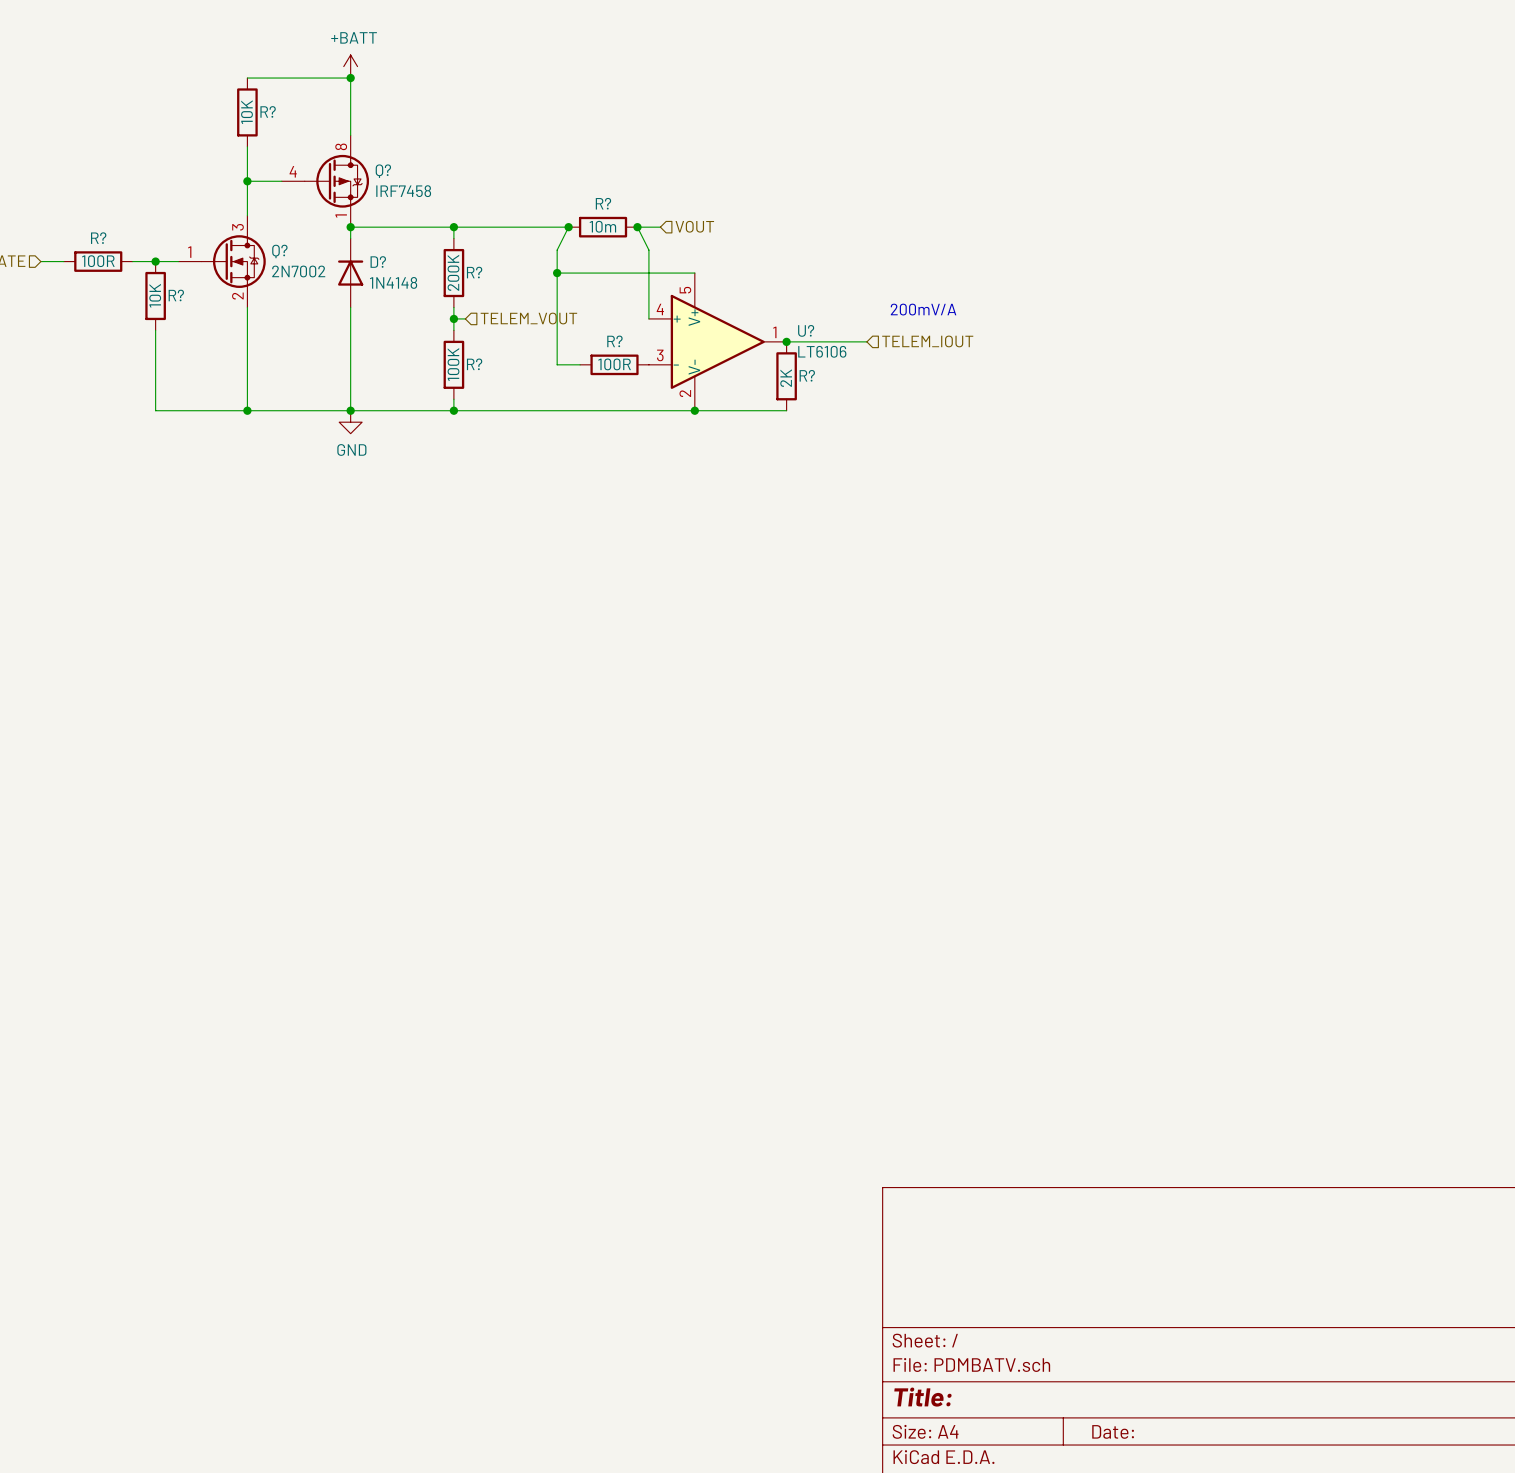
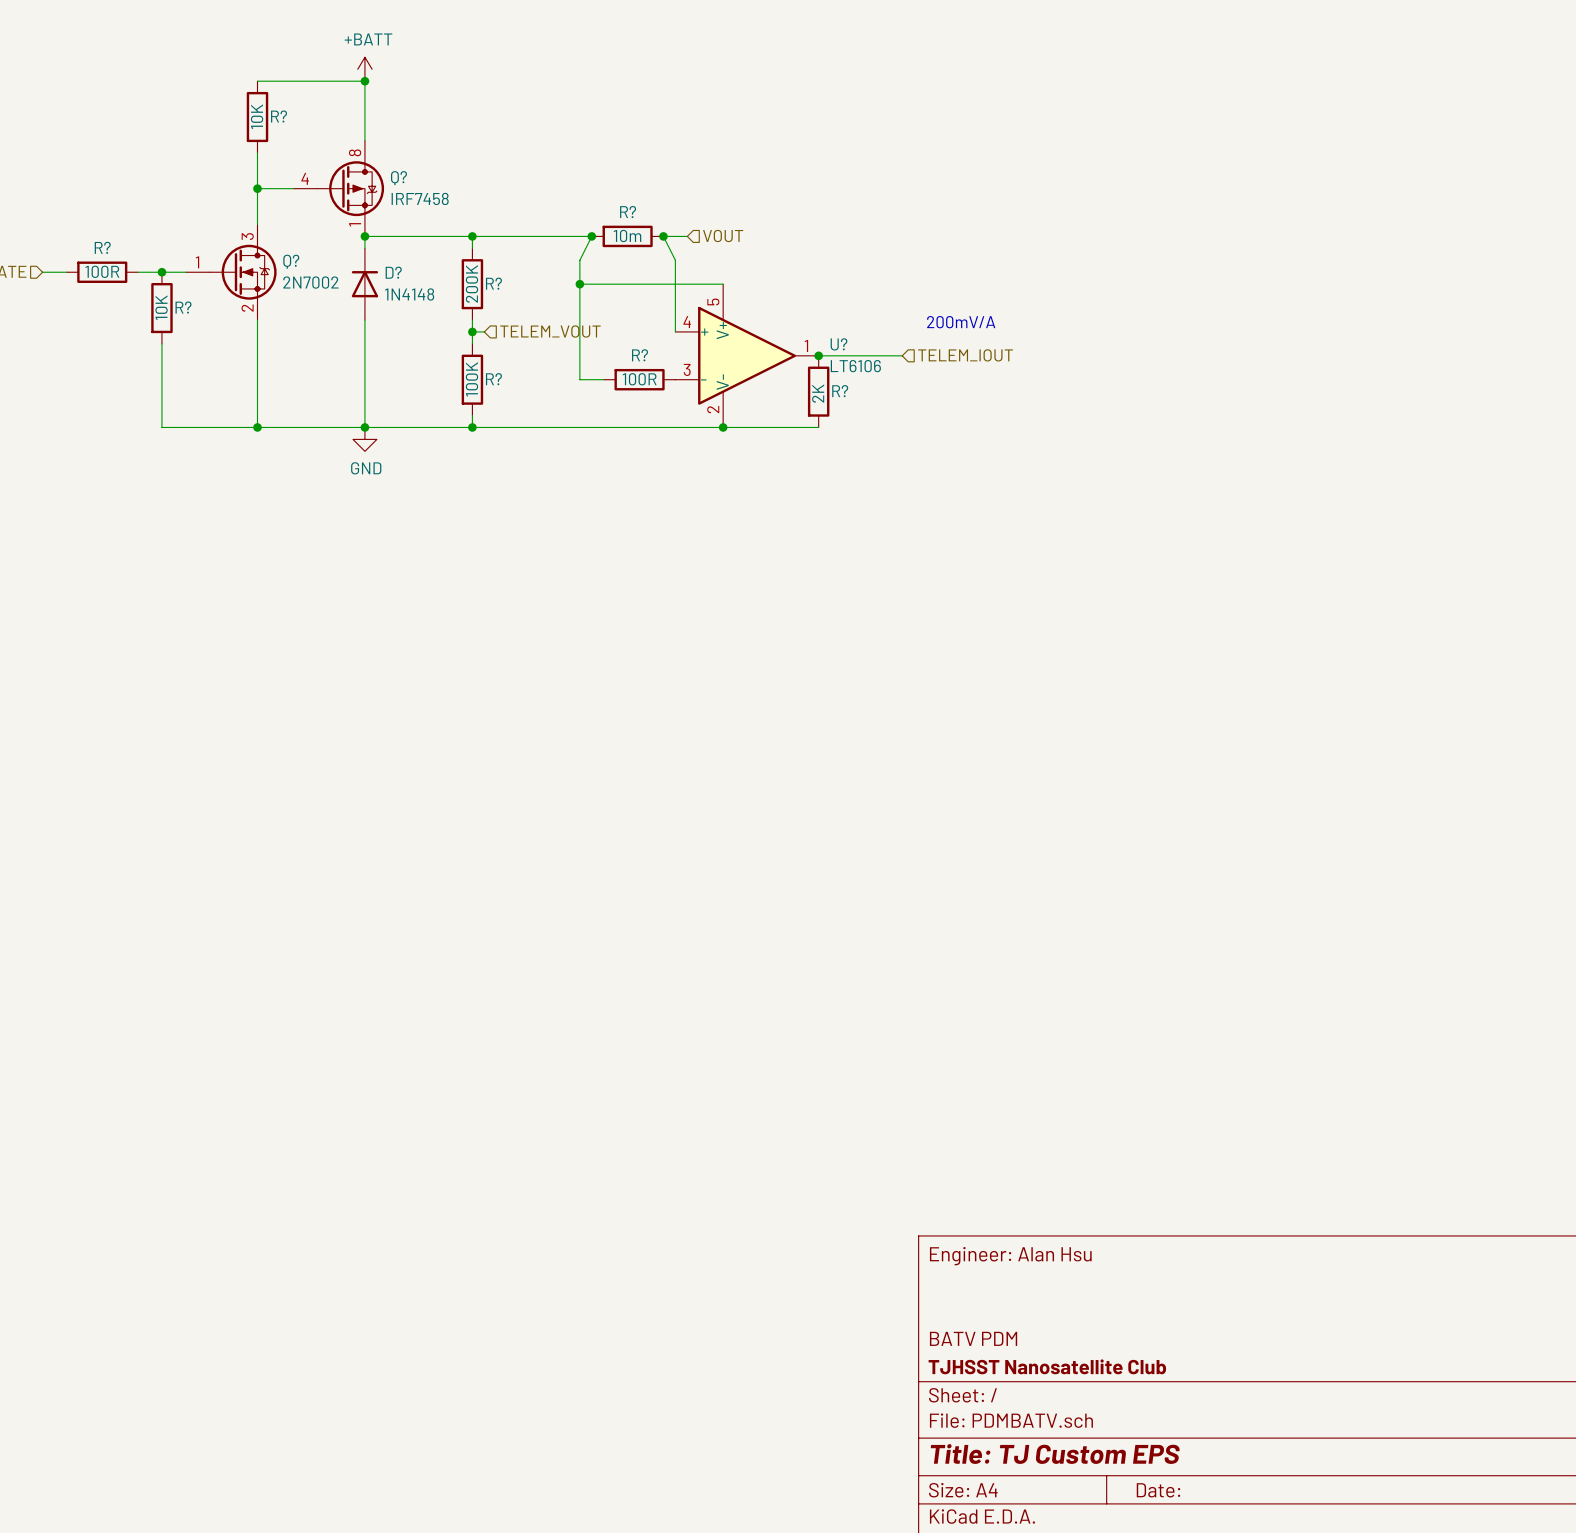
title block: none -> Engineer: Alan Hsu (1010, 1256)
title block: none -> BATV PDM (973, 1338)
title block: none -> TJHSST Nanosatellite Club (1047, 1366)
title block: Title: (922, 1397) -> Title: TJ Custom EPS (1055, 1454)

